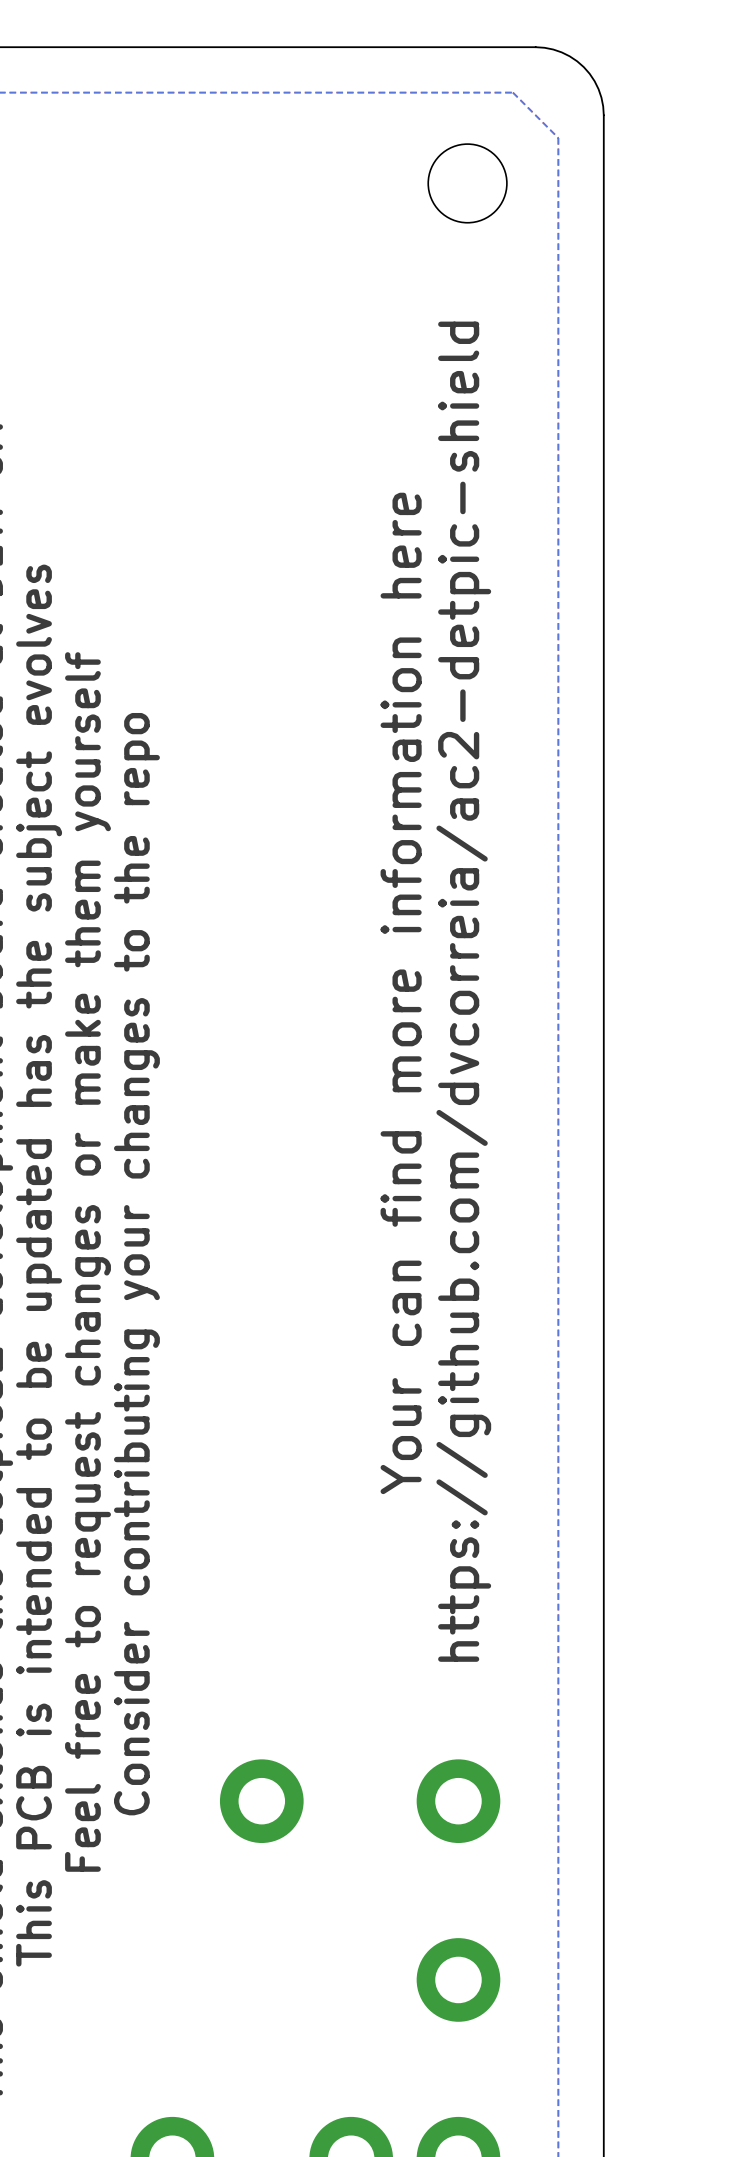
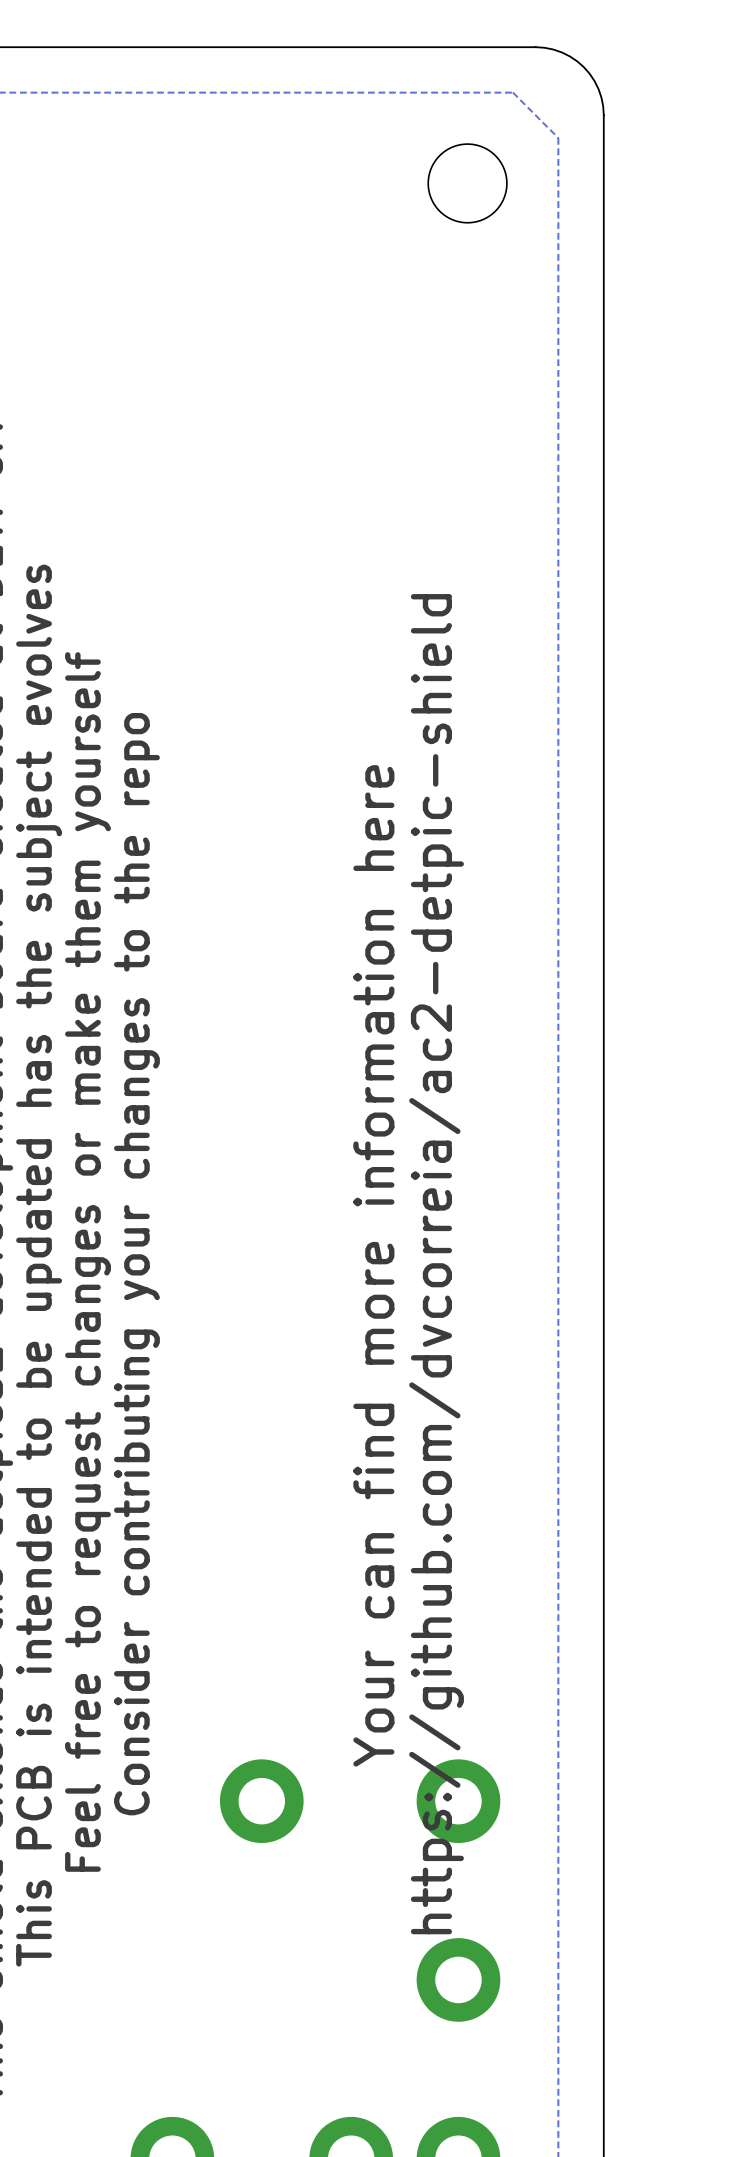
text position: https://github.com/dvcorreia/ac2-detpic-shield (463, 991) -> https://github.com/dvcorreia/ac2-detpic-shield (436, 1264)
text position: Your can find more information here (401, 993) -> Your can find more information here (373, 1265)

